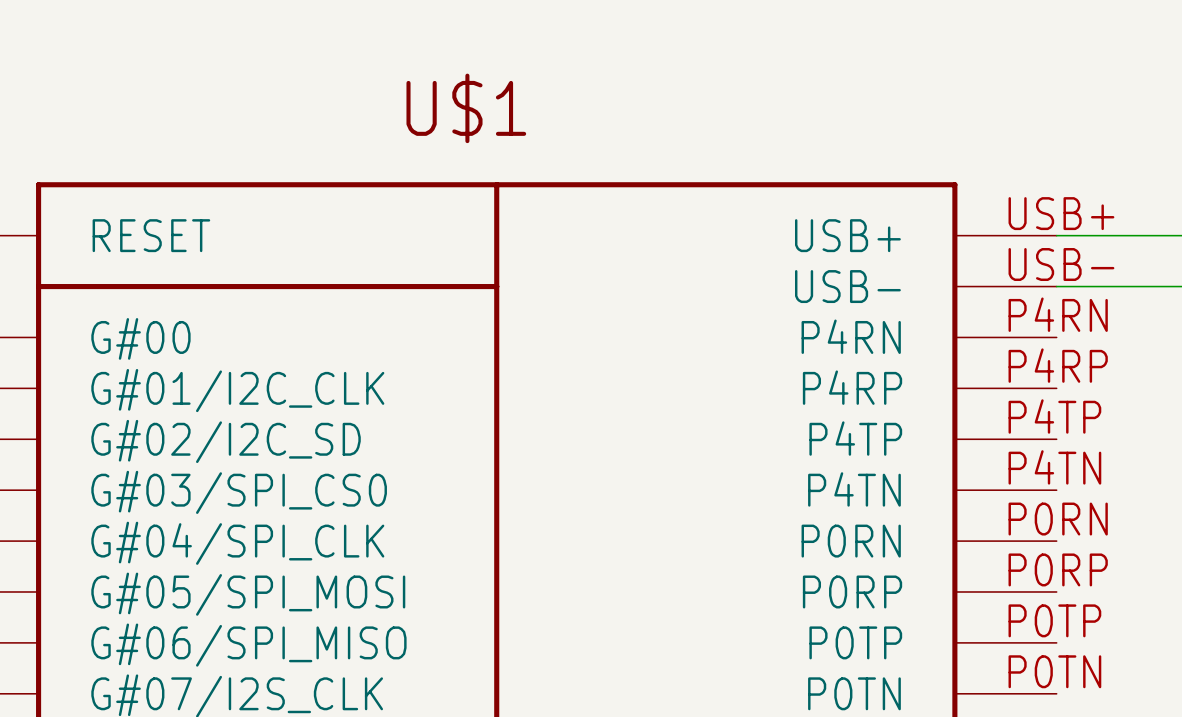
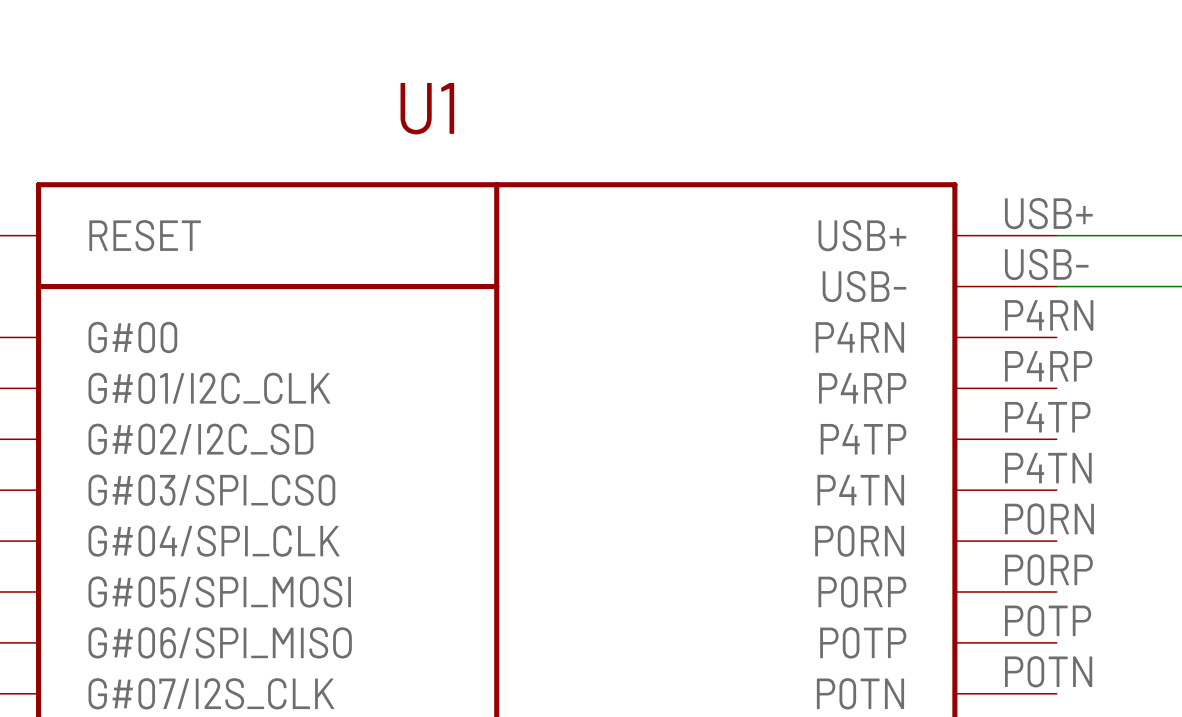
U$1 name: U$1 (466, 108) -> U1 (427, 108)

